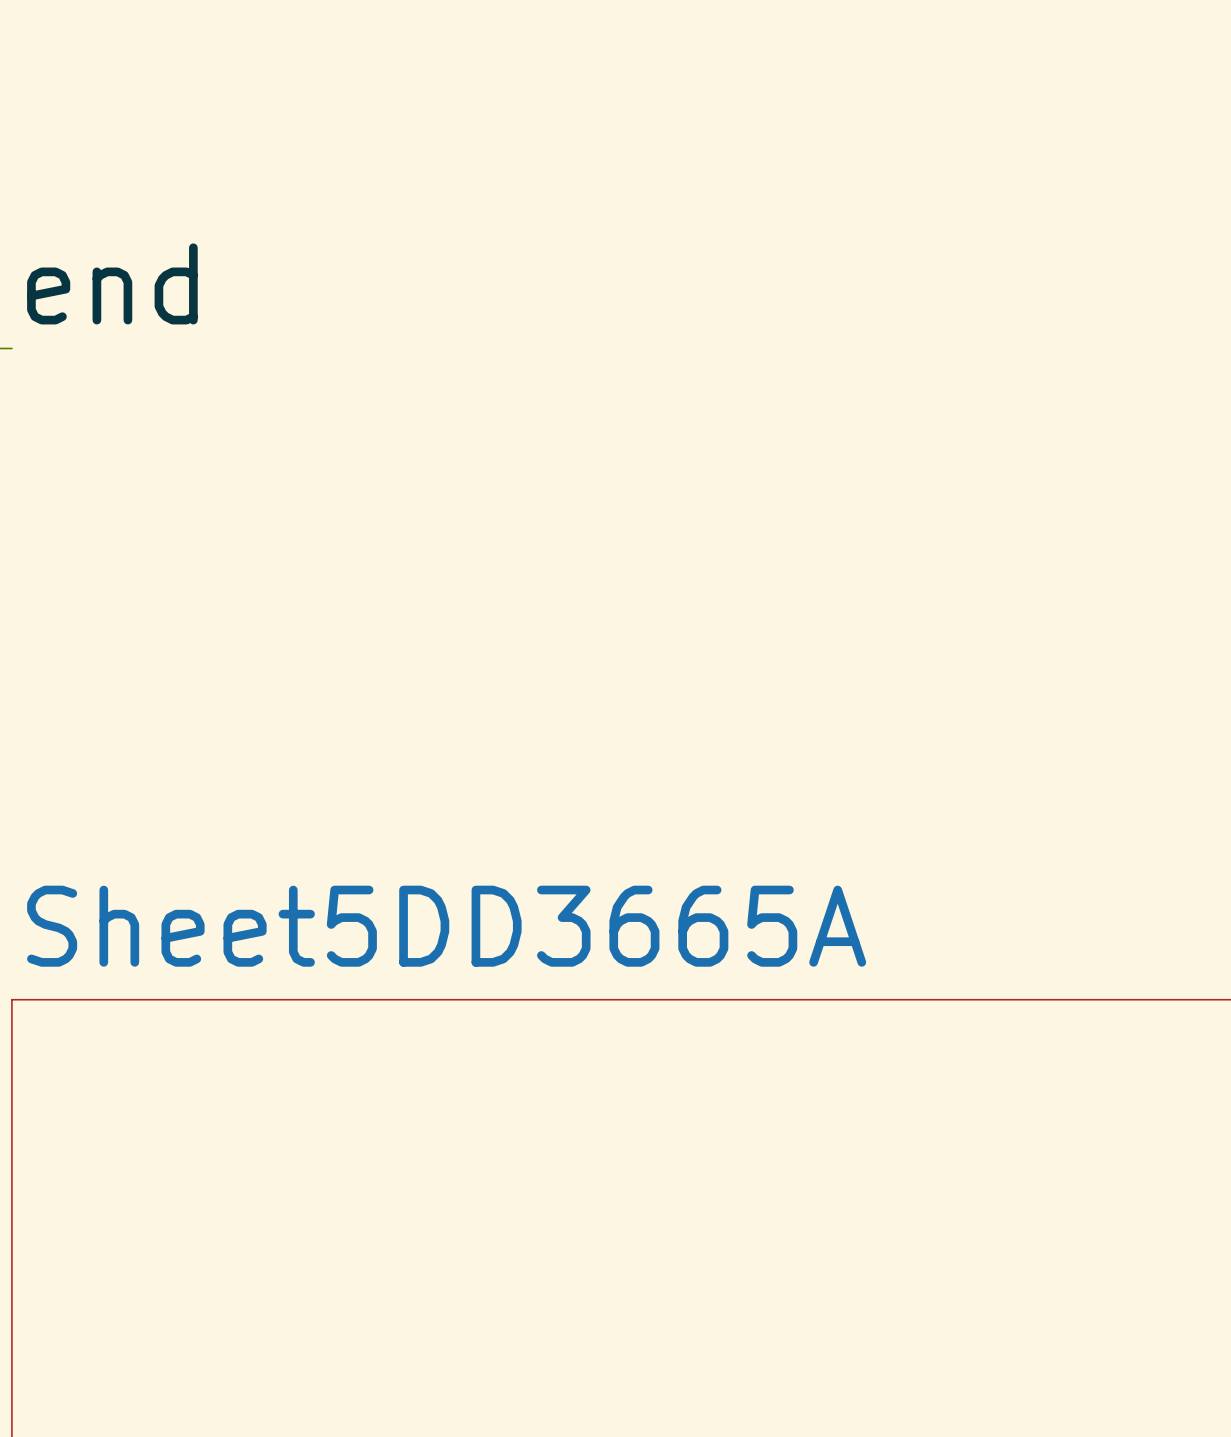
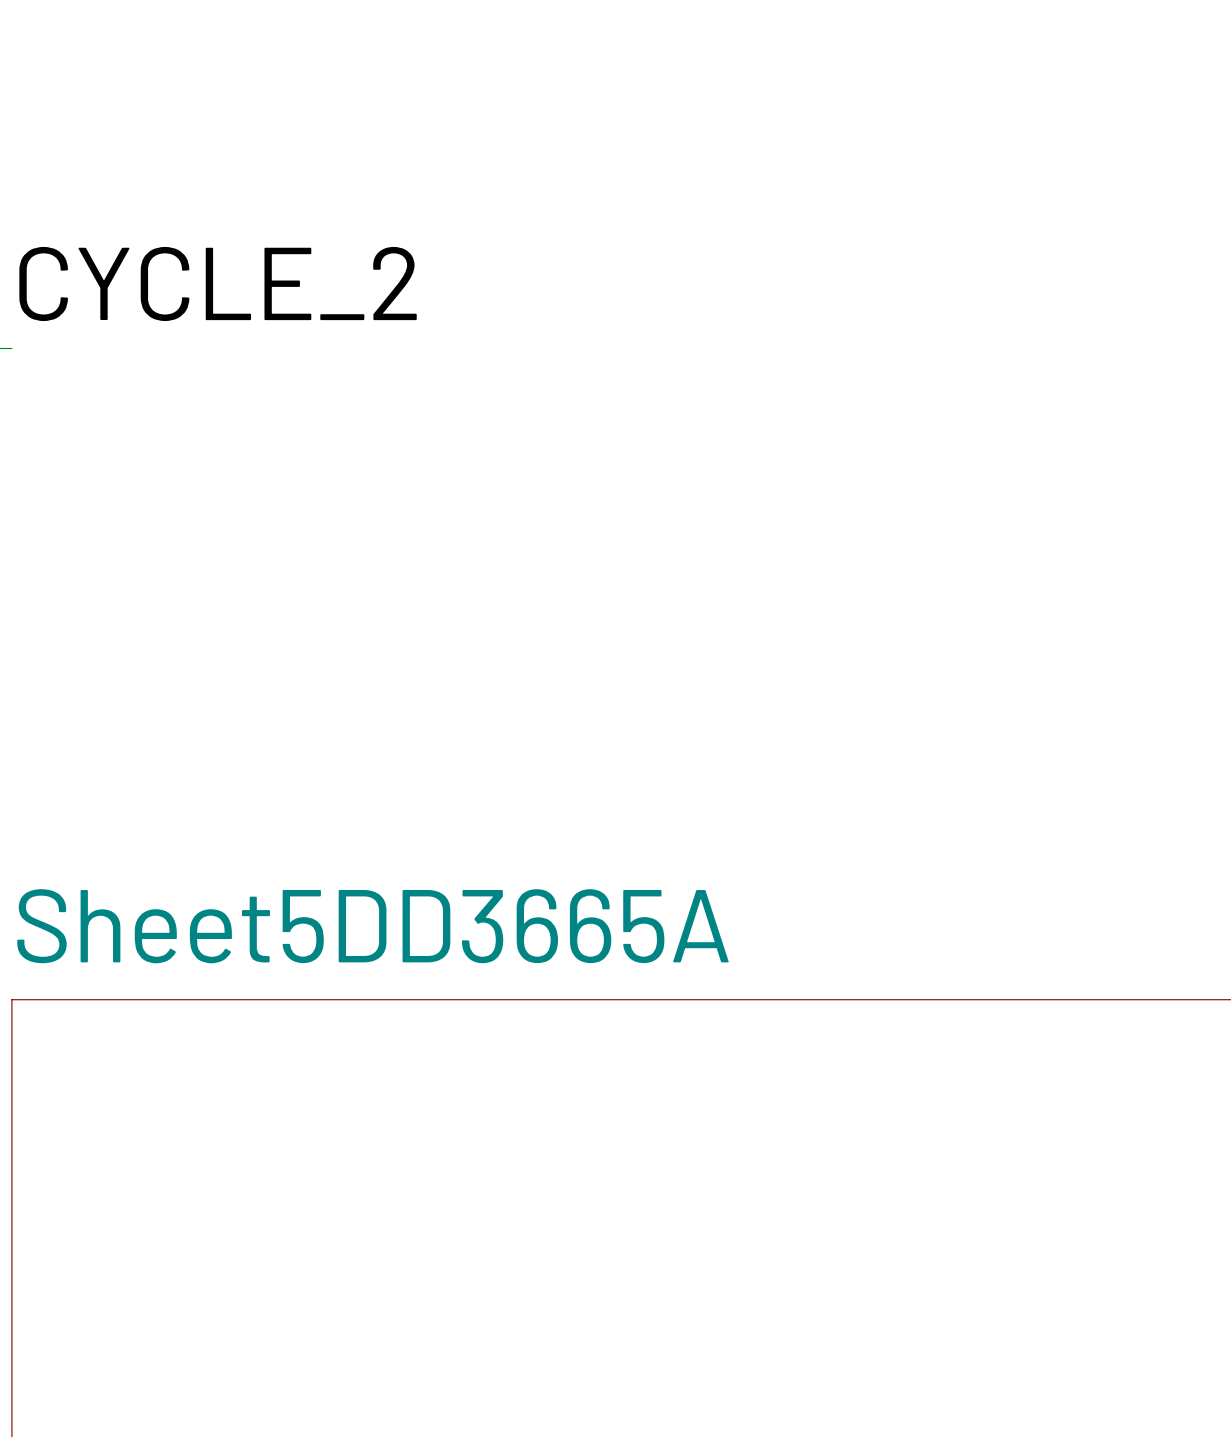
label: end (112, 283) -> CYCLE_2 (218, 283)

